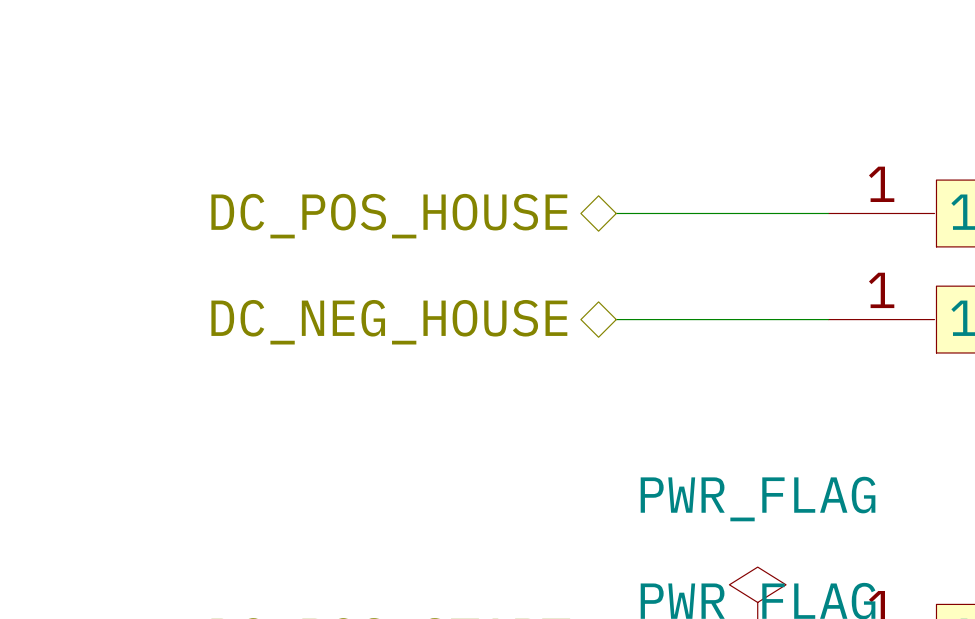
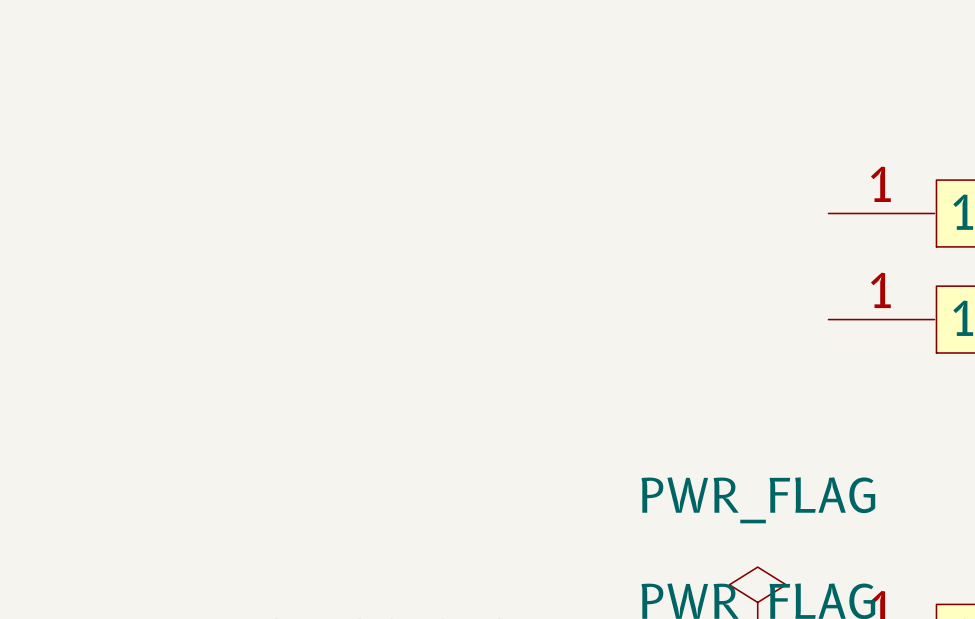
wire: (616, 213) (828, 213) -> none
hierarchical label: DC_POS_HOUSE (389, 216) -> none
wire: (616, 319) (828, 319) -> none
hierarchical label: DC_NEG_HOUSE (389, 322) -> none

